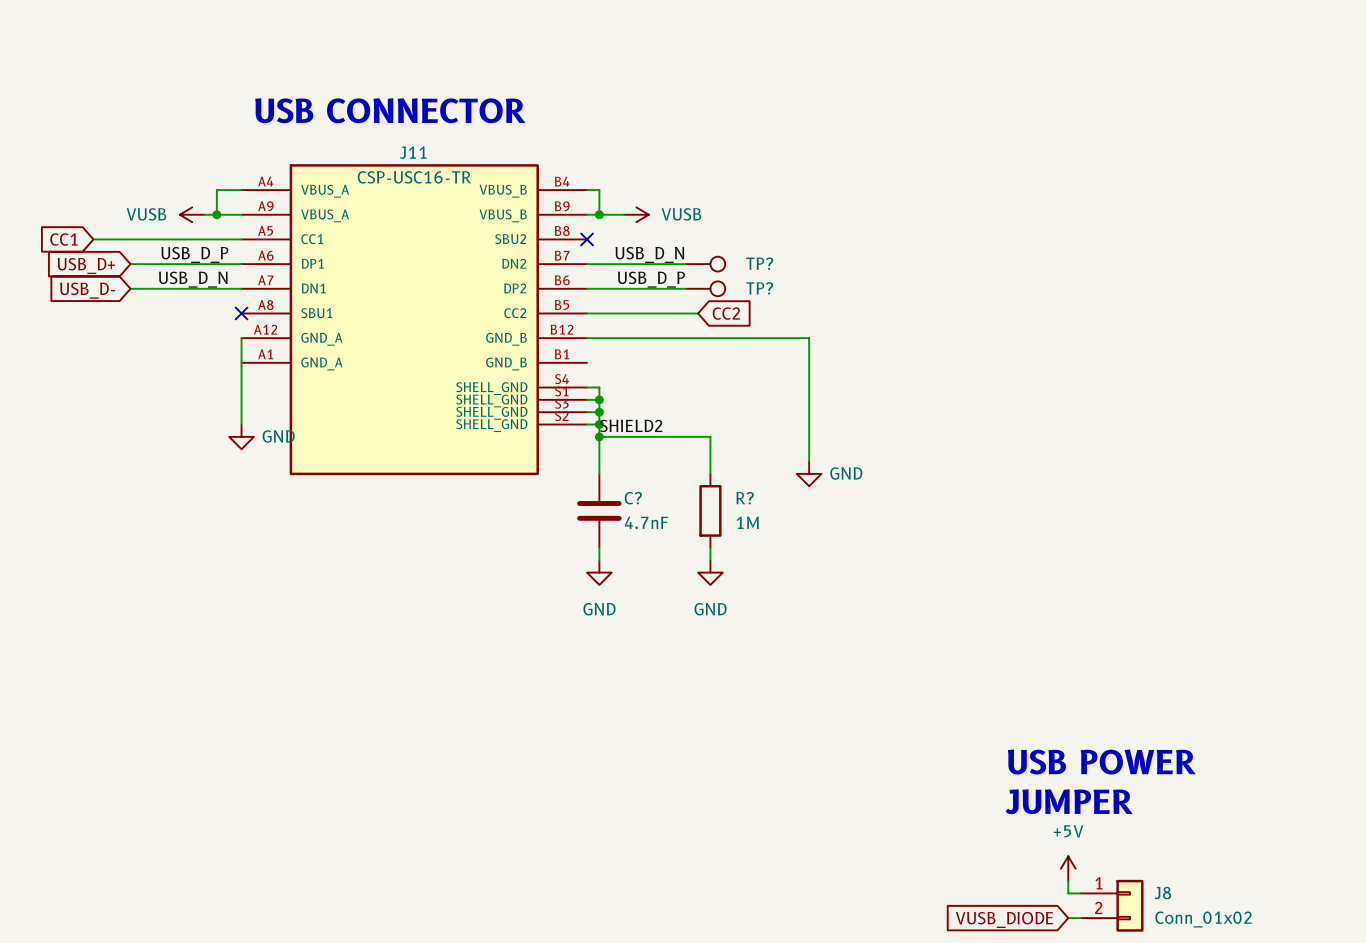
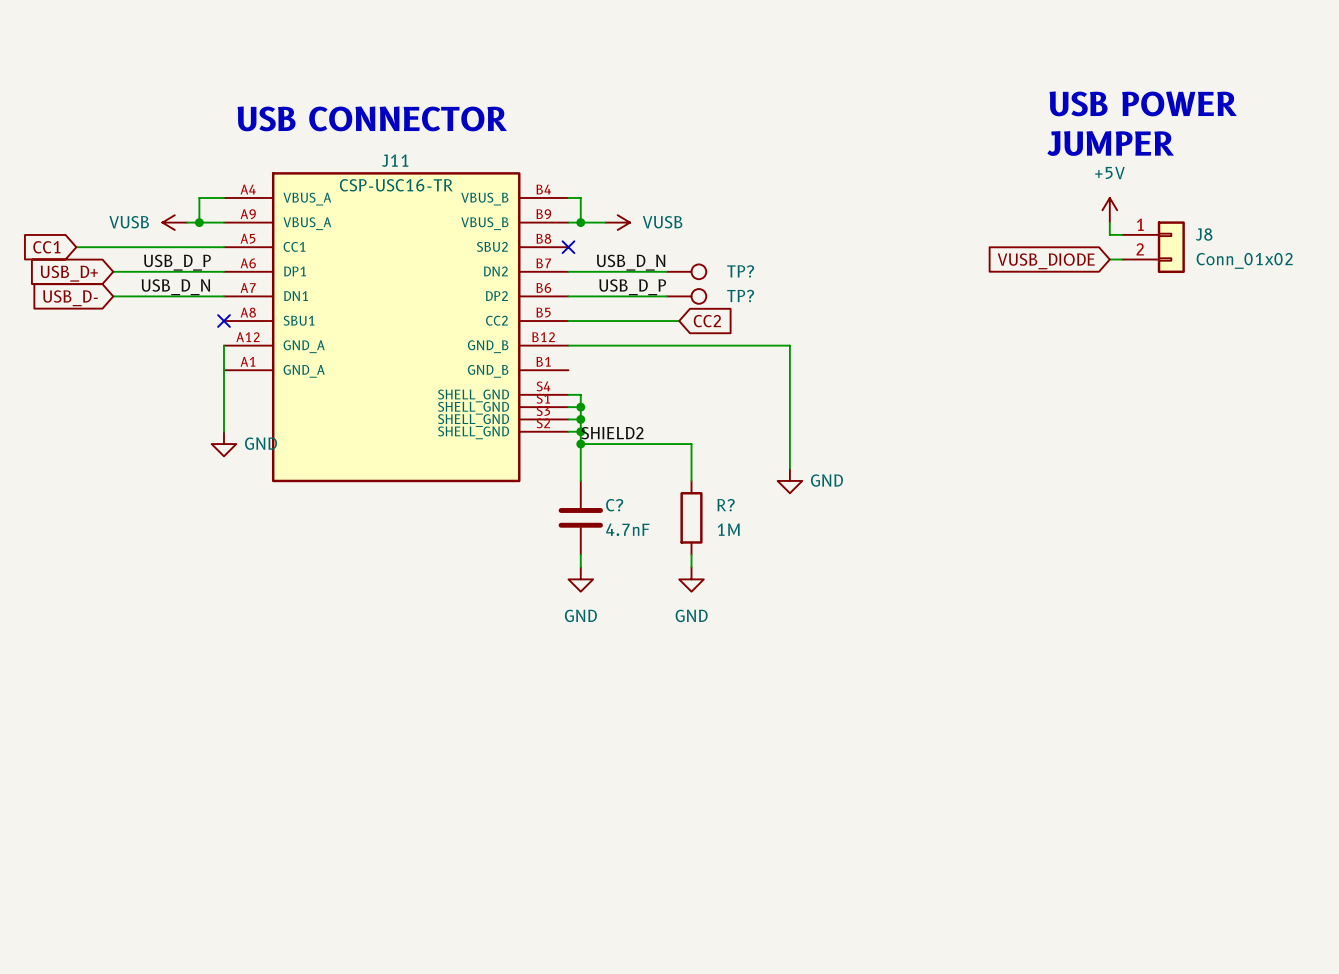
text: none -> USB POWER (1143, 103)
text: none -> JUMPER (1110, 143)
power symbol: none -> +5V (1109, 210)
wire: none -> (1109, 222) (1109, 234) (1122, 234)
wire: none -> (1109, 259) (1122, 259)
global label: none -> VUSB_DIODE (1046, 261)
text: USB POWER (1101, 762) -> none
text: JUMPER (1069, 801) -> none
power symbol: +5V (1068, 868) -> none
wire: (1068, 881) (1068, 893) (1080, 893) -> none
J8 position: (1112, 905) -> (1153, 247)
wire: (1068, 918) (1080, 918) -> none
global label: VUSB_DIODE (1004, 919) -> none

